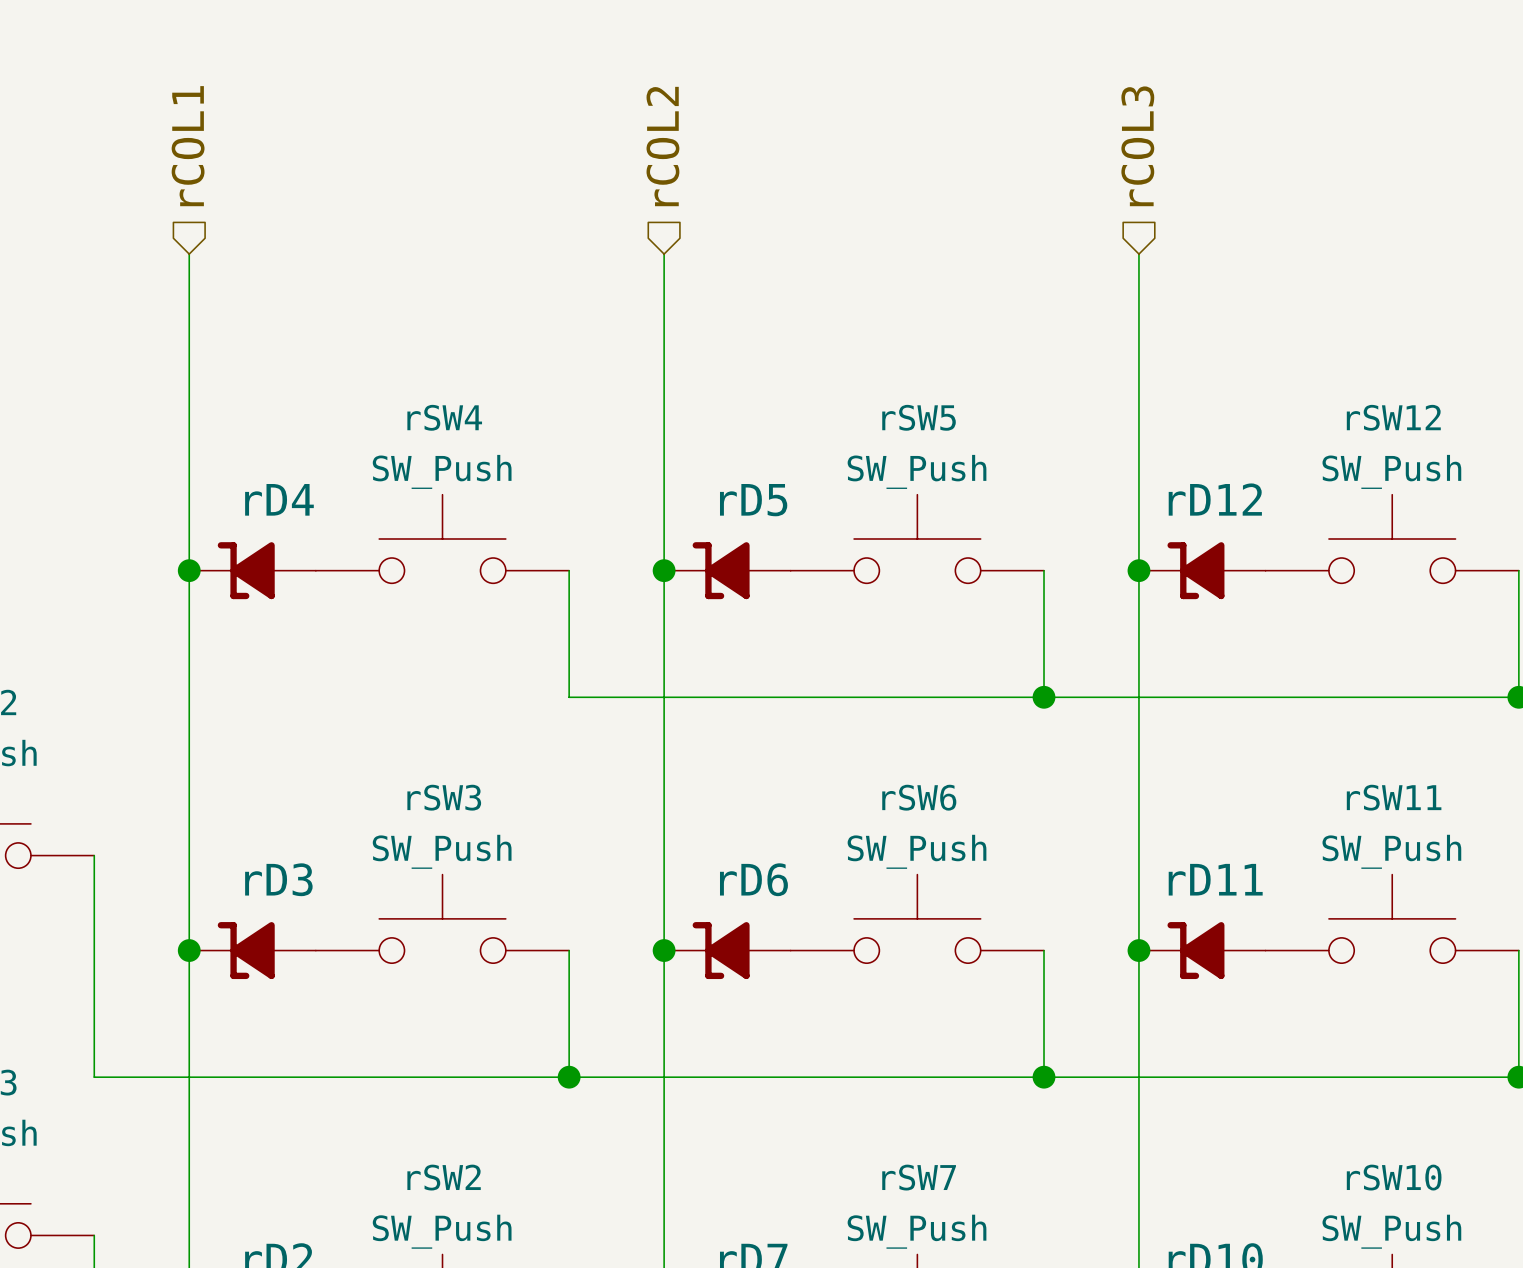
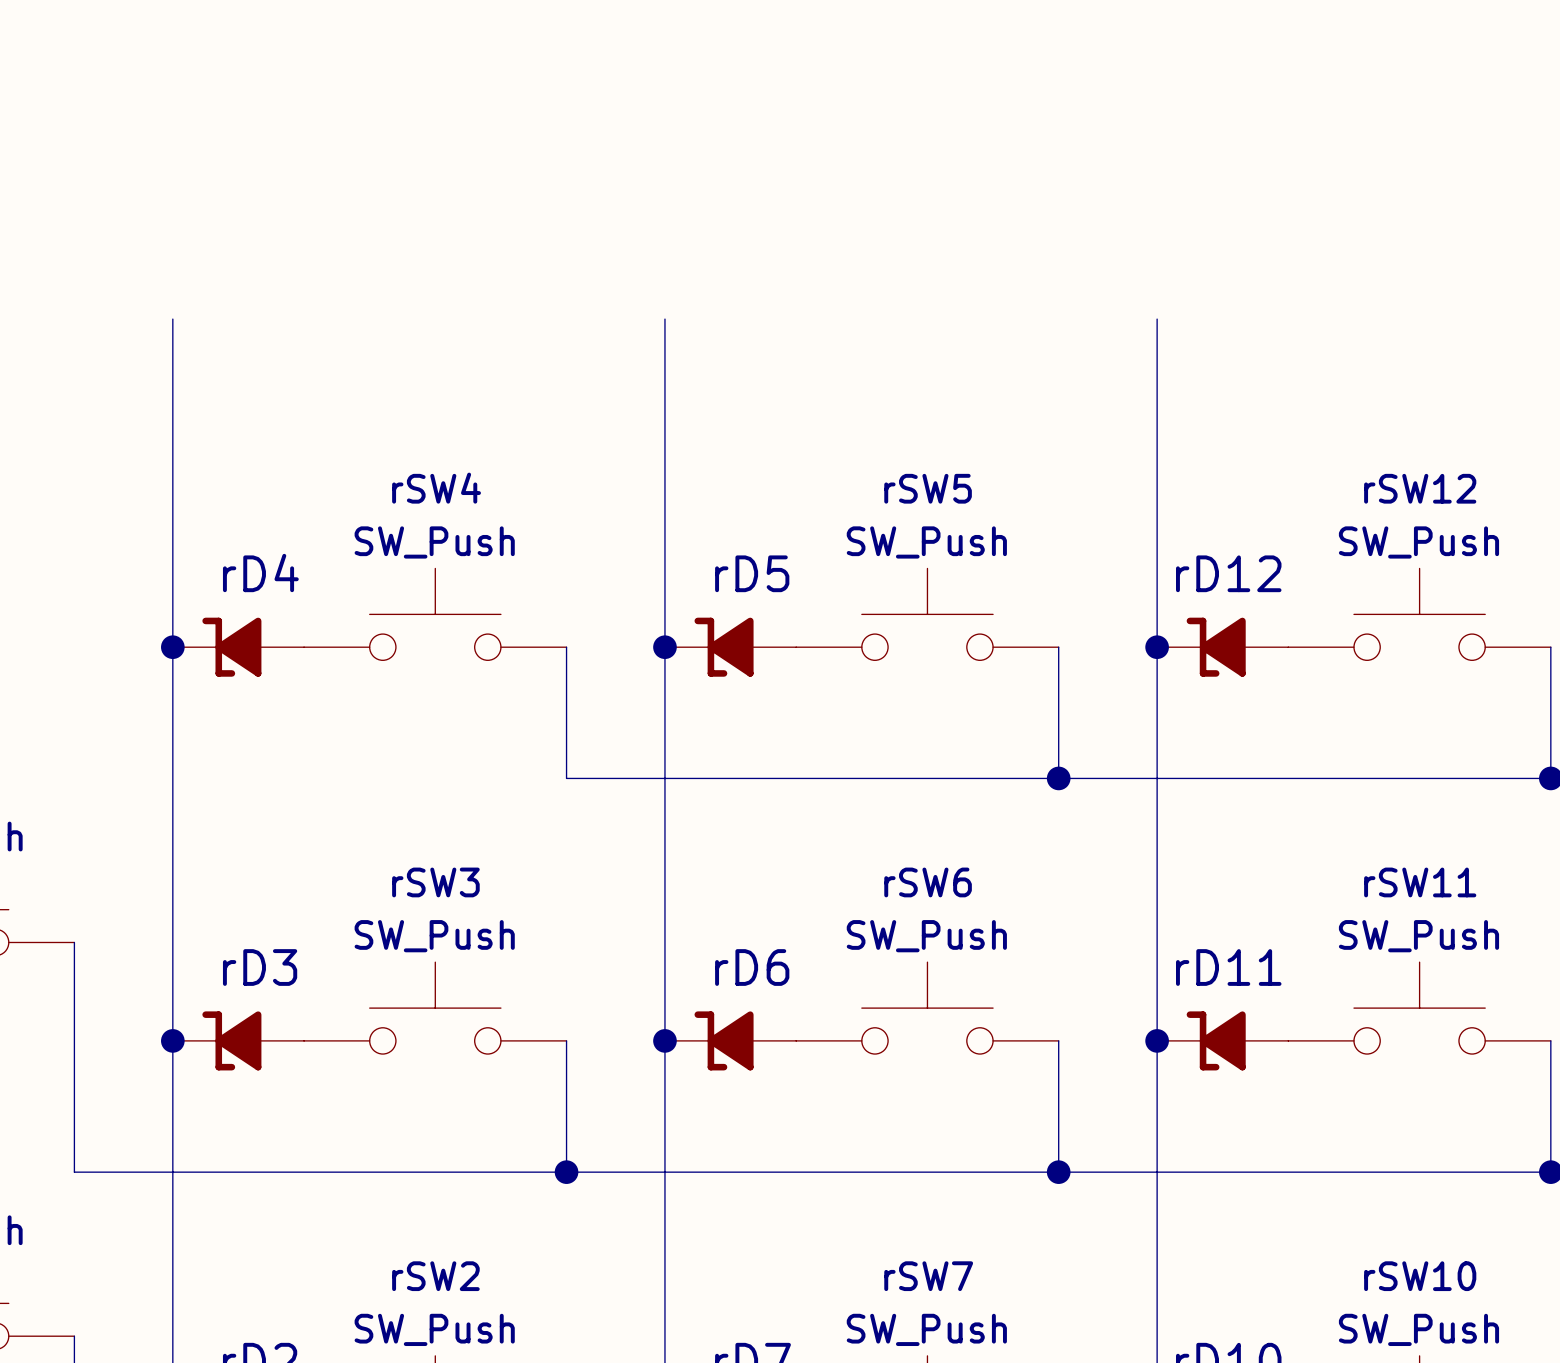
hierarchical label: rCOL1 (188, 146) -> none
hierarchical label: rCOL2 (662, 146) -> none
hierarchical label: rCOL3 (1137, 146) -> none

